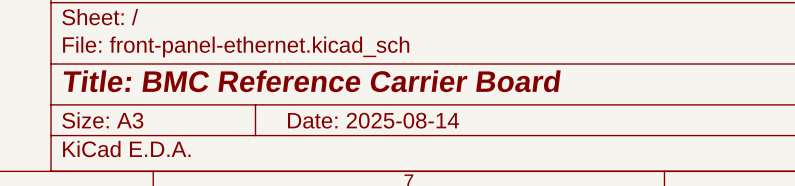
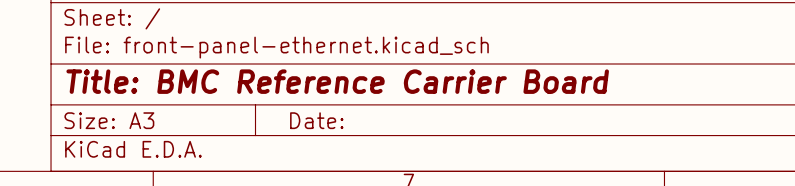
title block: Date: 2025-08-14 (373, 120) -> Date: (316, 120)

